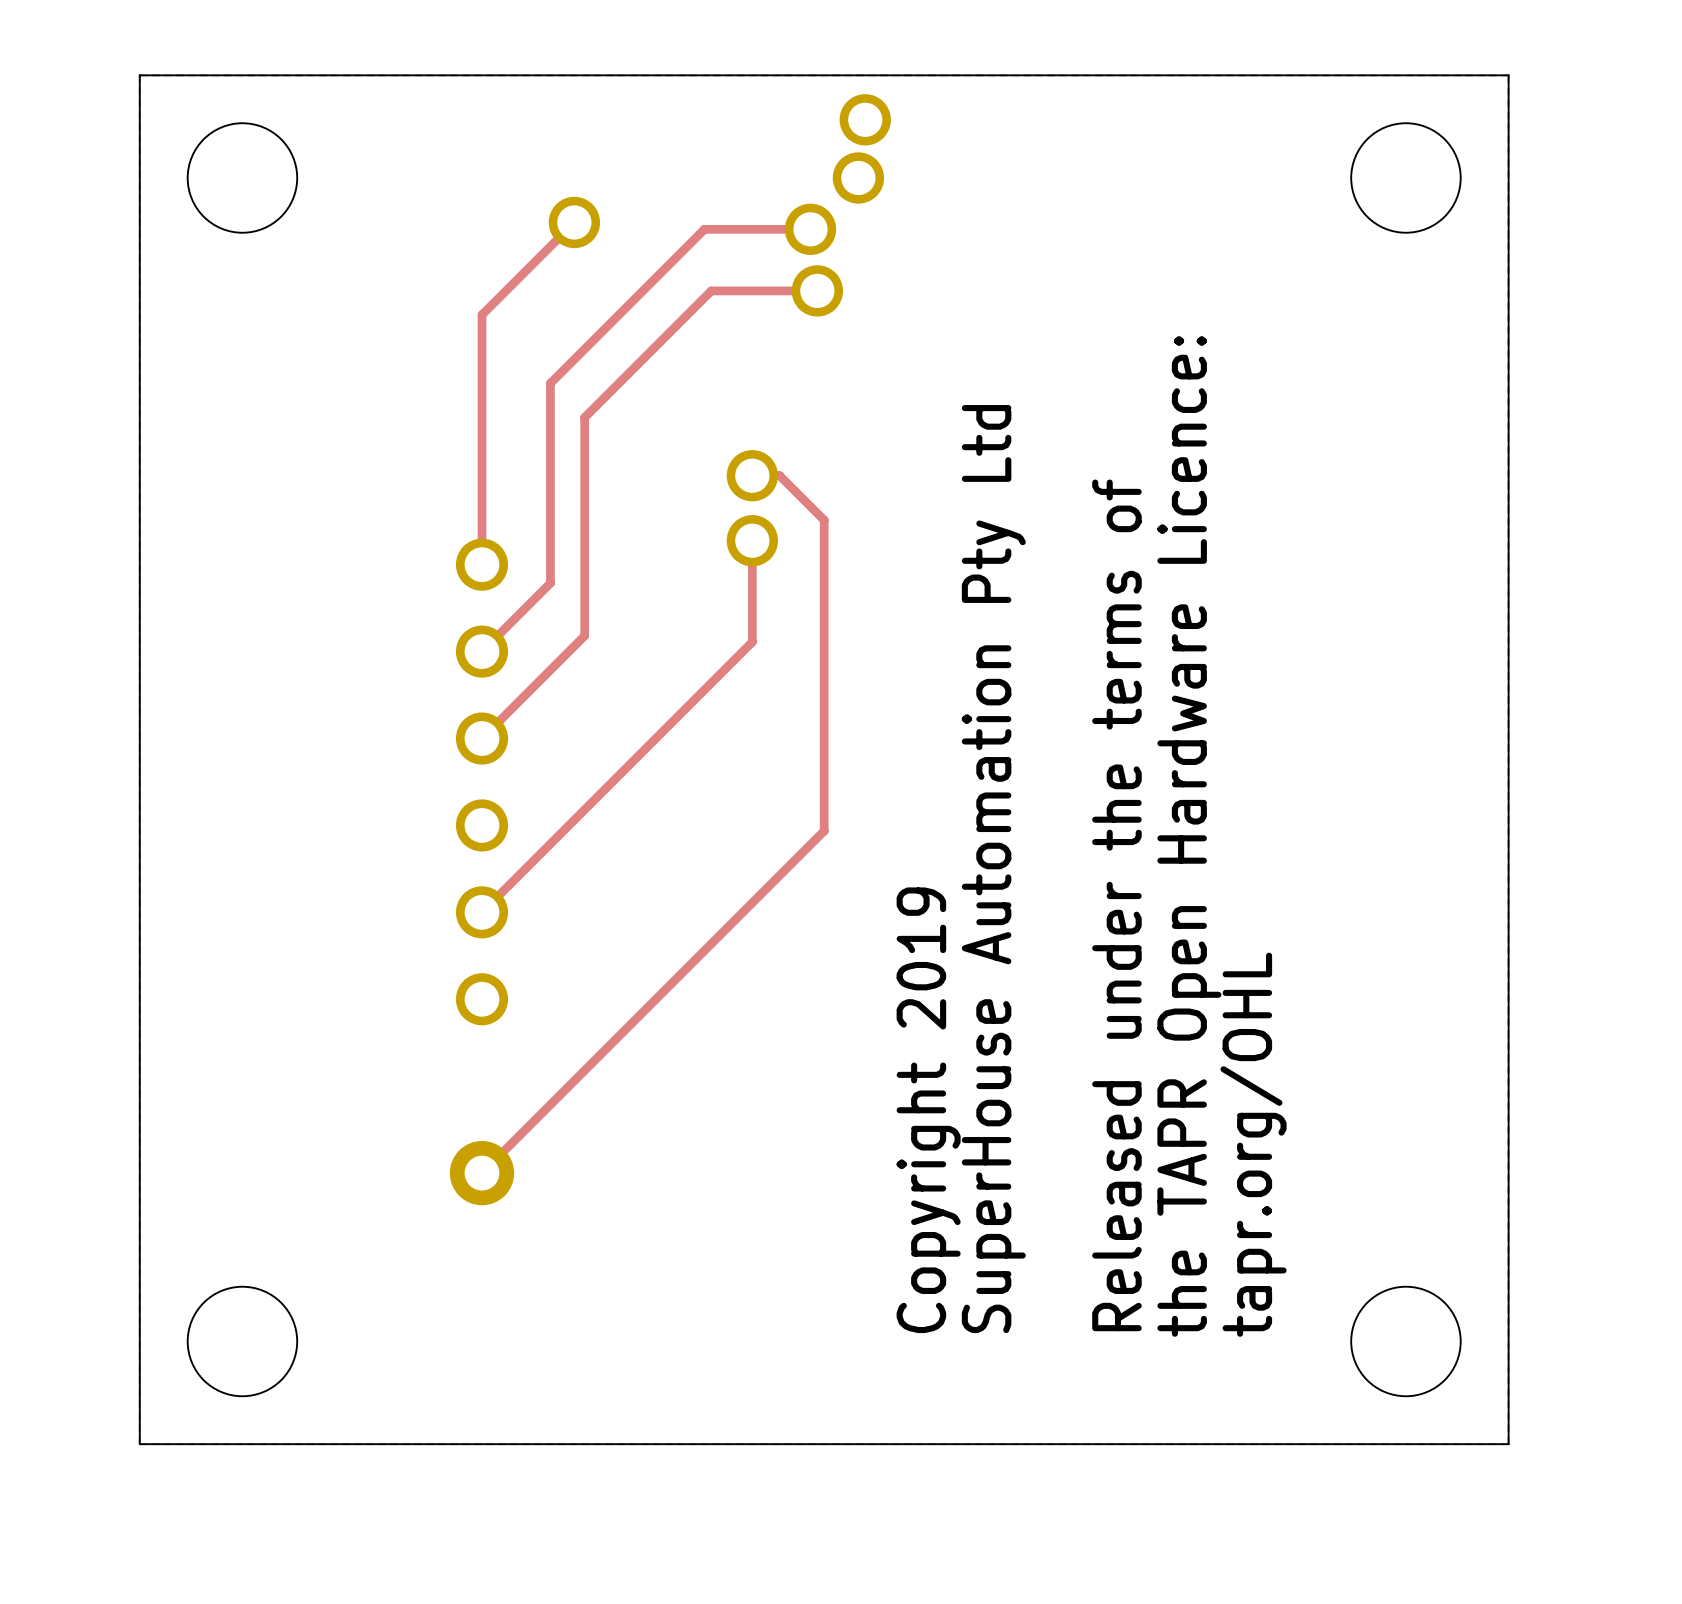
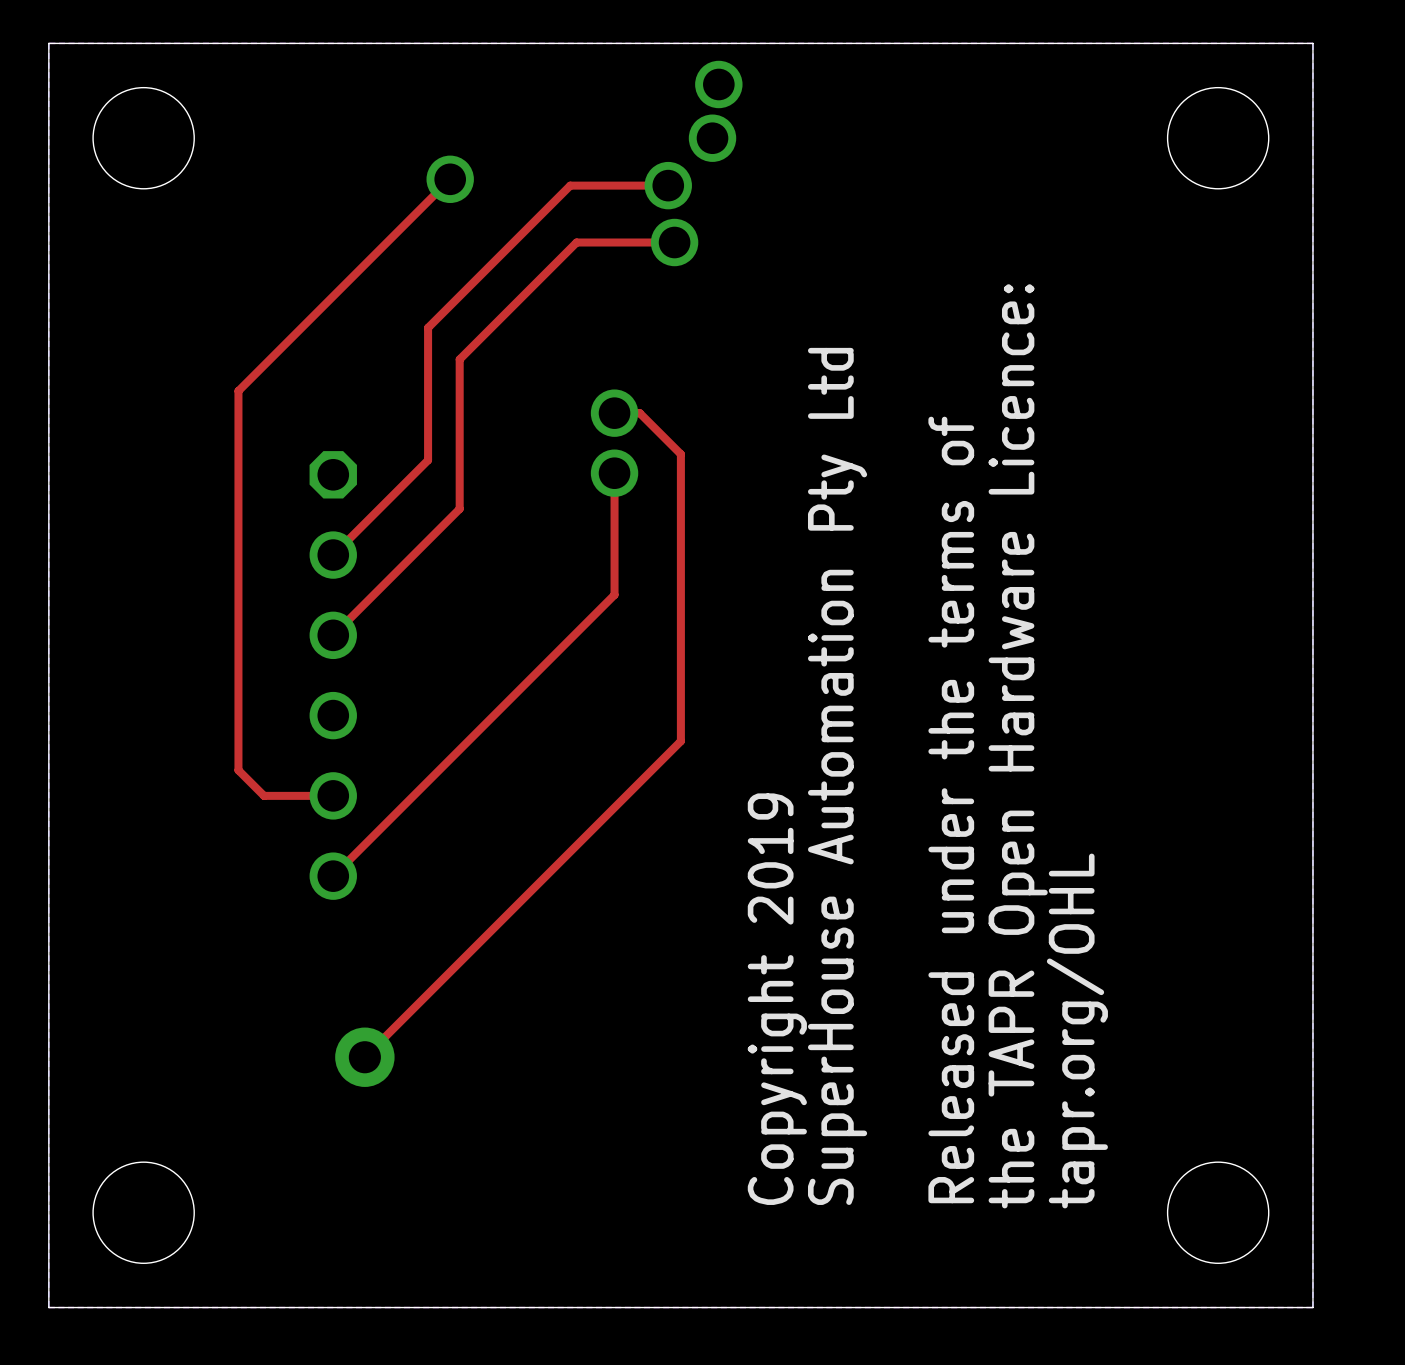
top track: (481, 314) (481, 564) -> (364, 264) (238, 391) (238, 770) (264, 795) (333, 795)
top track: (550, 526) (550, 583) (481, 651) -> (428, 460) (333, 555)
top track: (584, 579) (584, 635) (481, 738) -> (459, 508) (333, 635)
top track: (752, 642) (481, 912) -> (614, 566) (614, 594) (333, 876)
part: none -> (333, 675)
part: (481, 781) -> none

